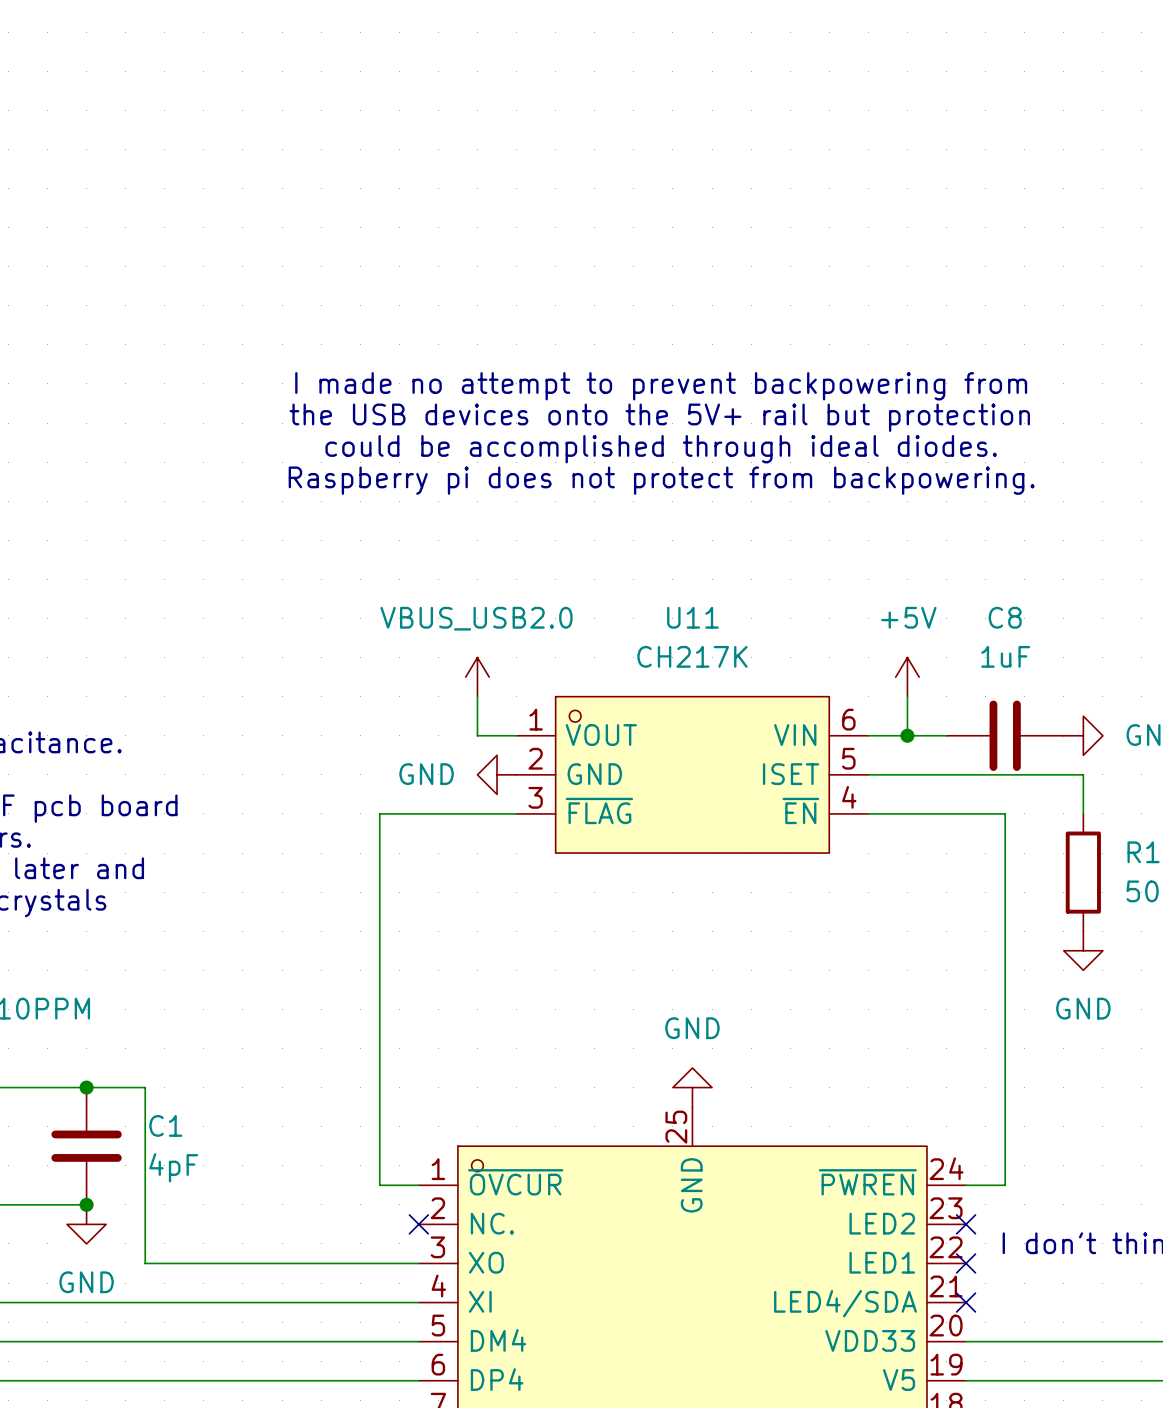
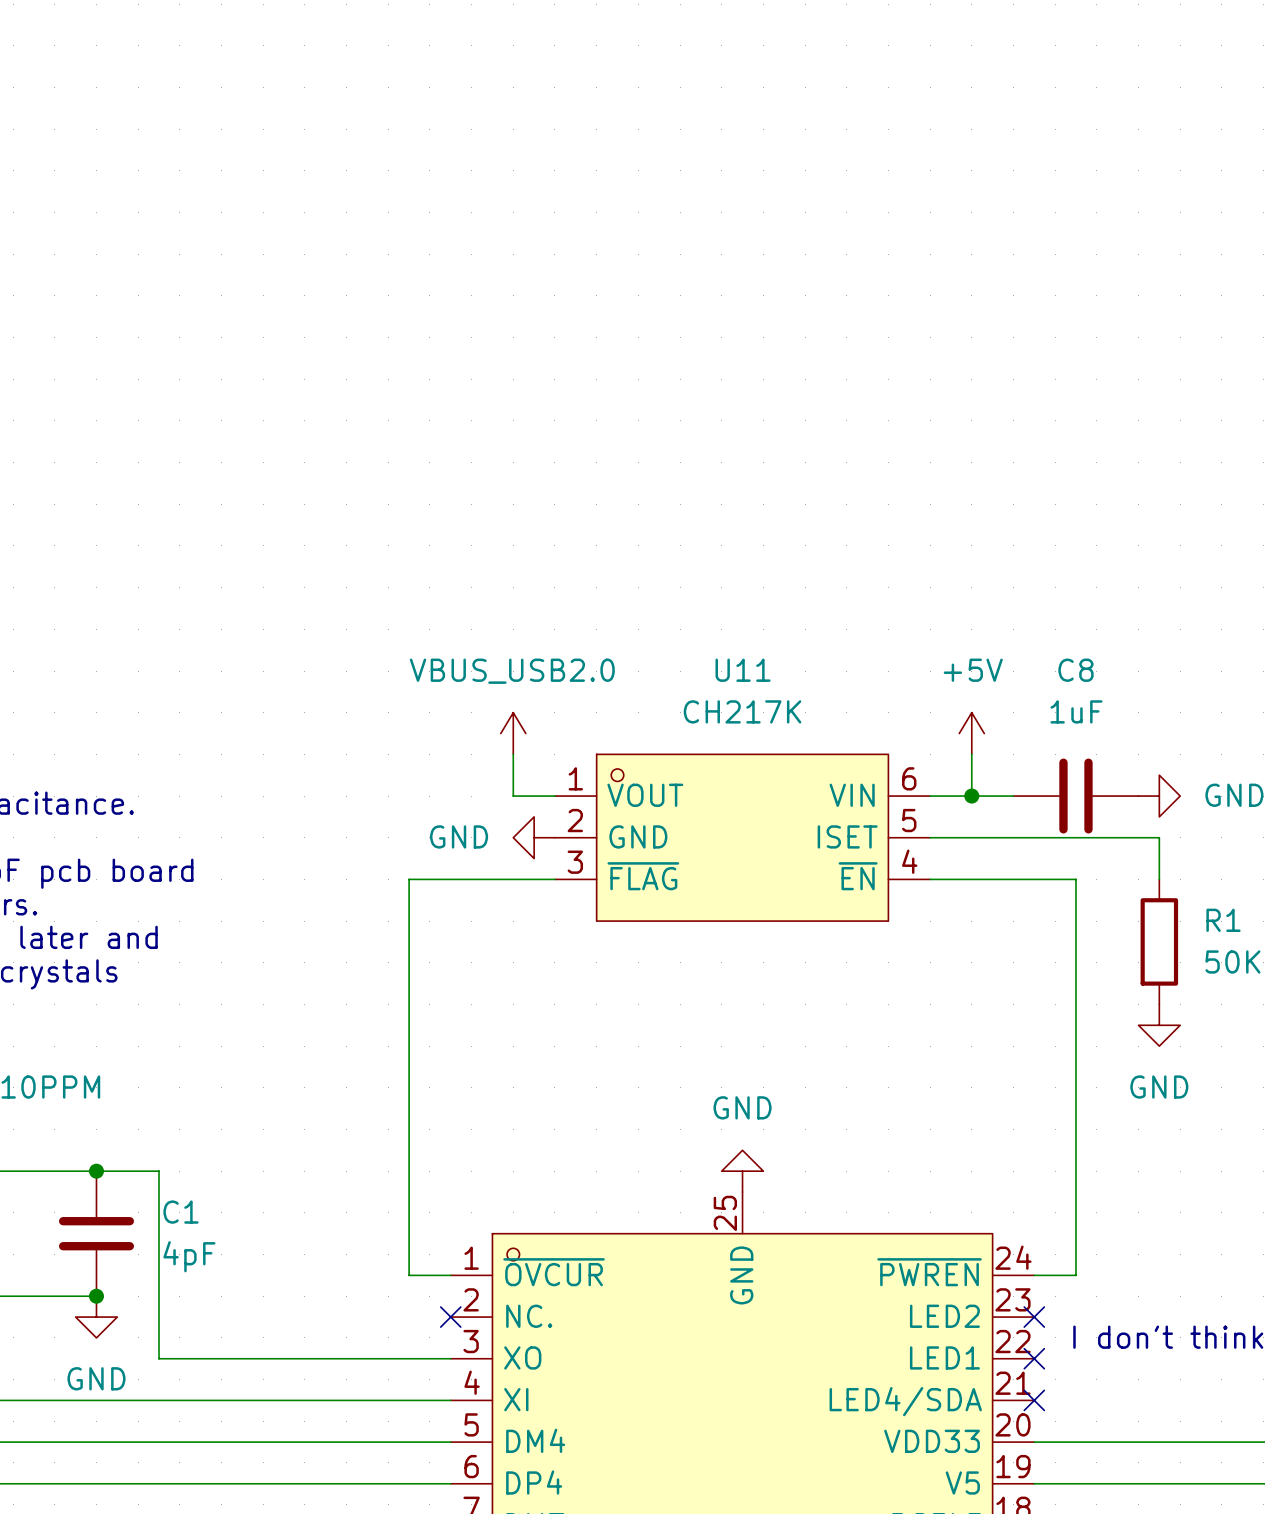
text: I made no attempt to prevent backpowering from (661, 386) -> none
text: the USB devices onto the 5V+ rail but protection (659, 417) -> none
text: could be accomplished through ideal diodes. (661, 449) -> none
text: Raspberry pi does not protect from backpowering. (661, 480) -> none

